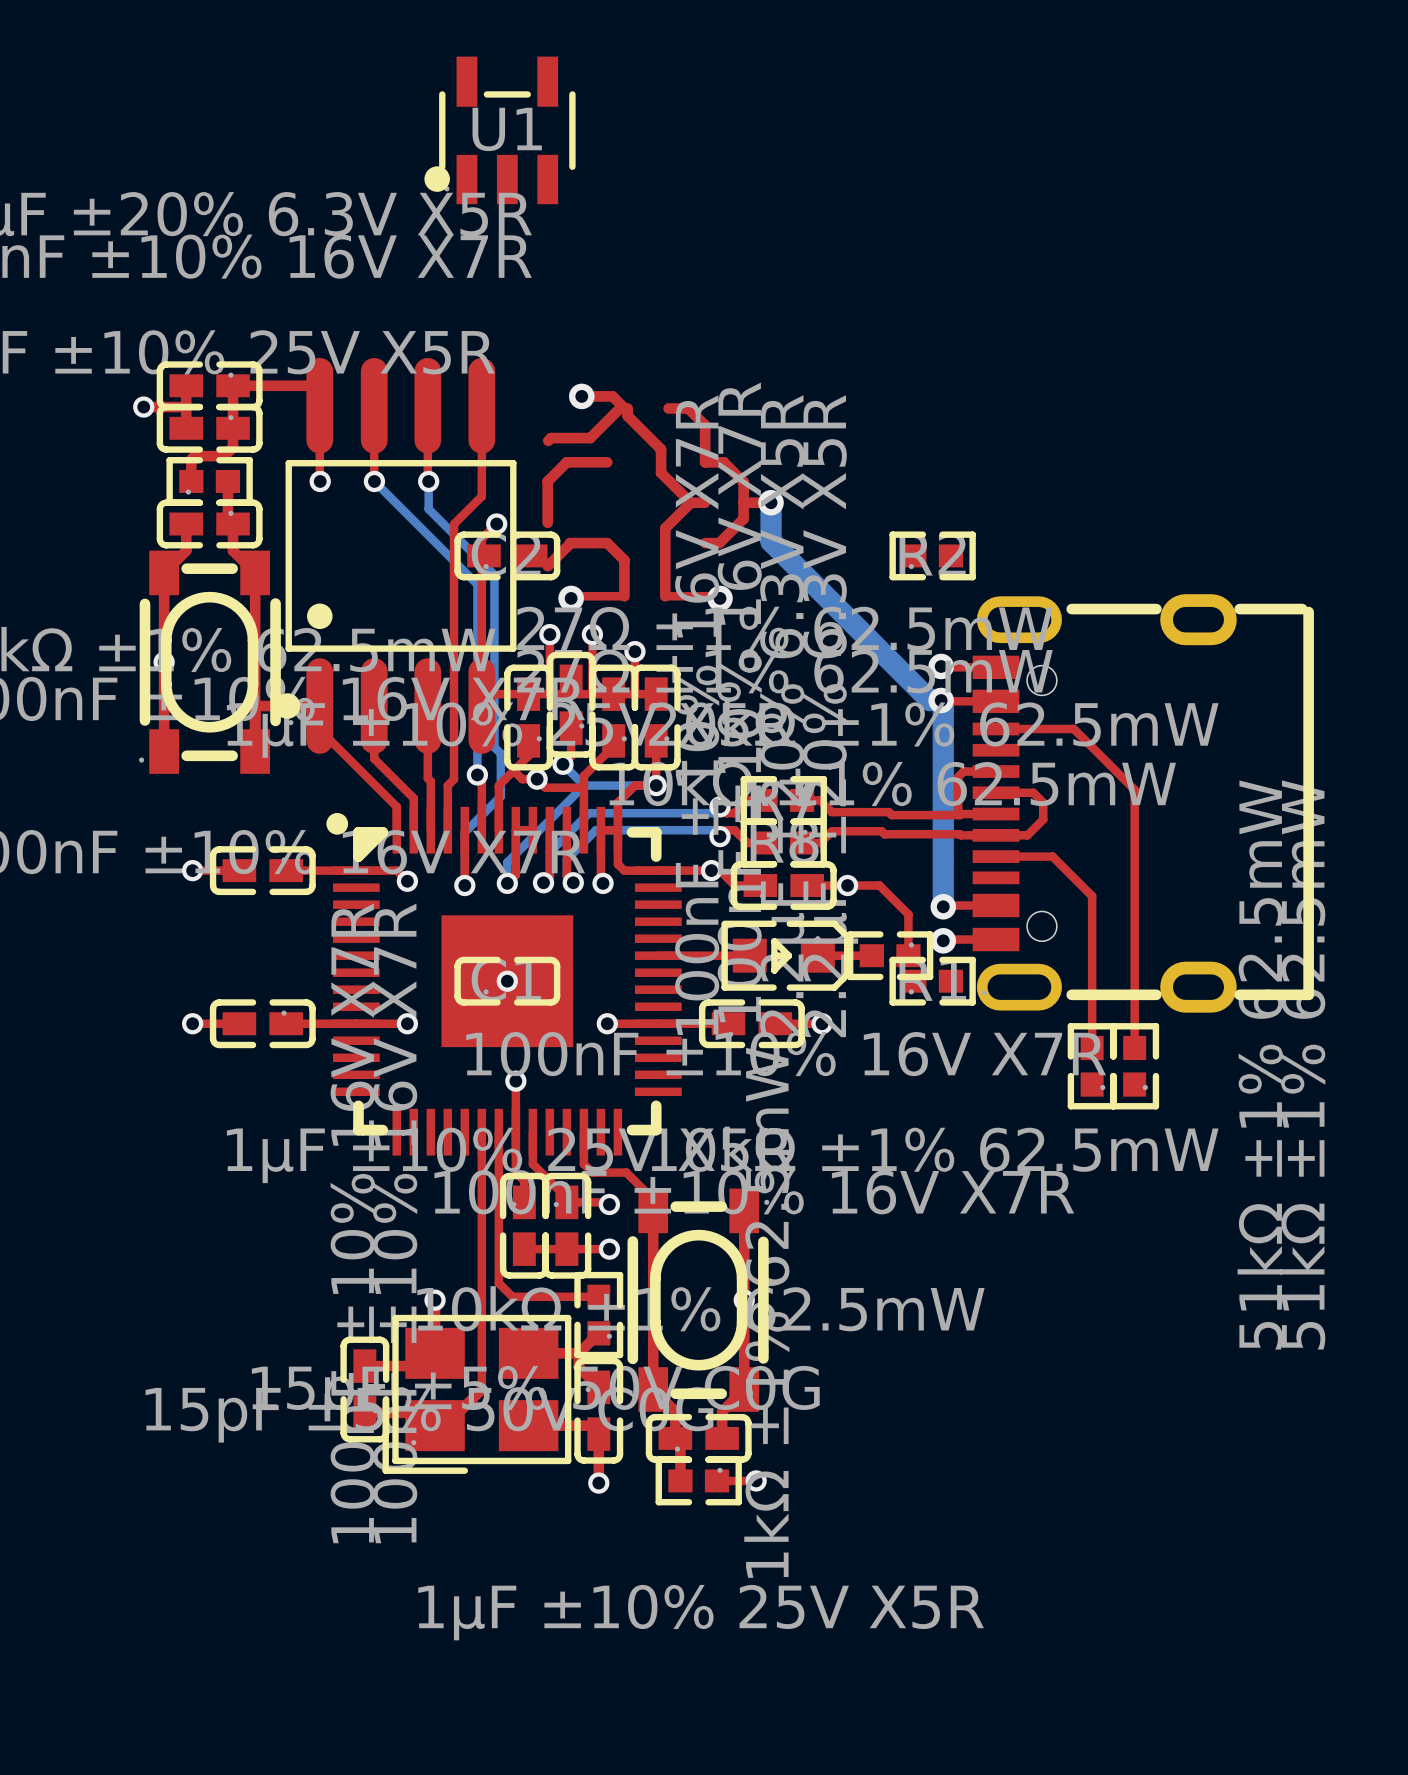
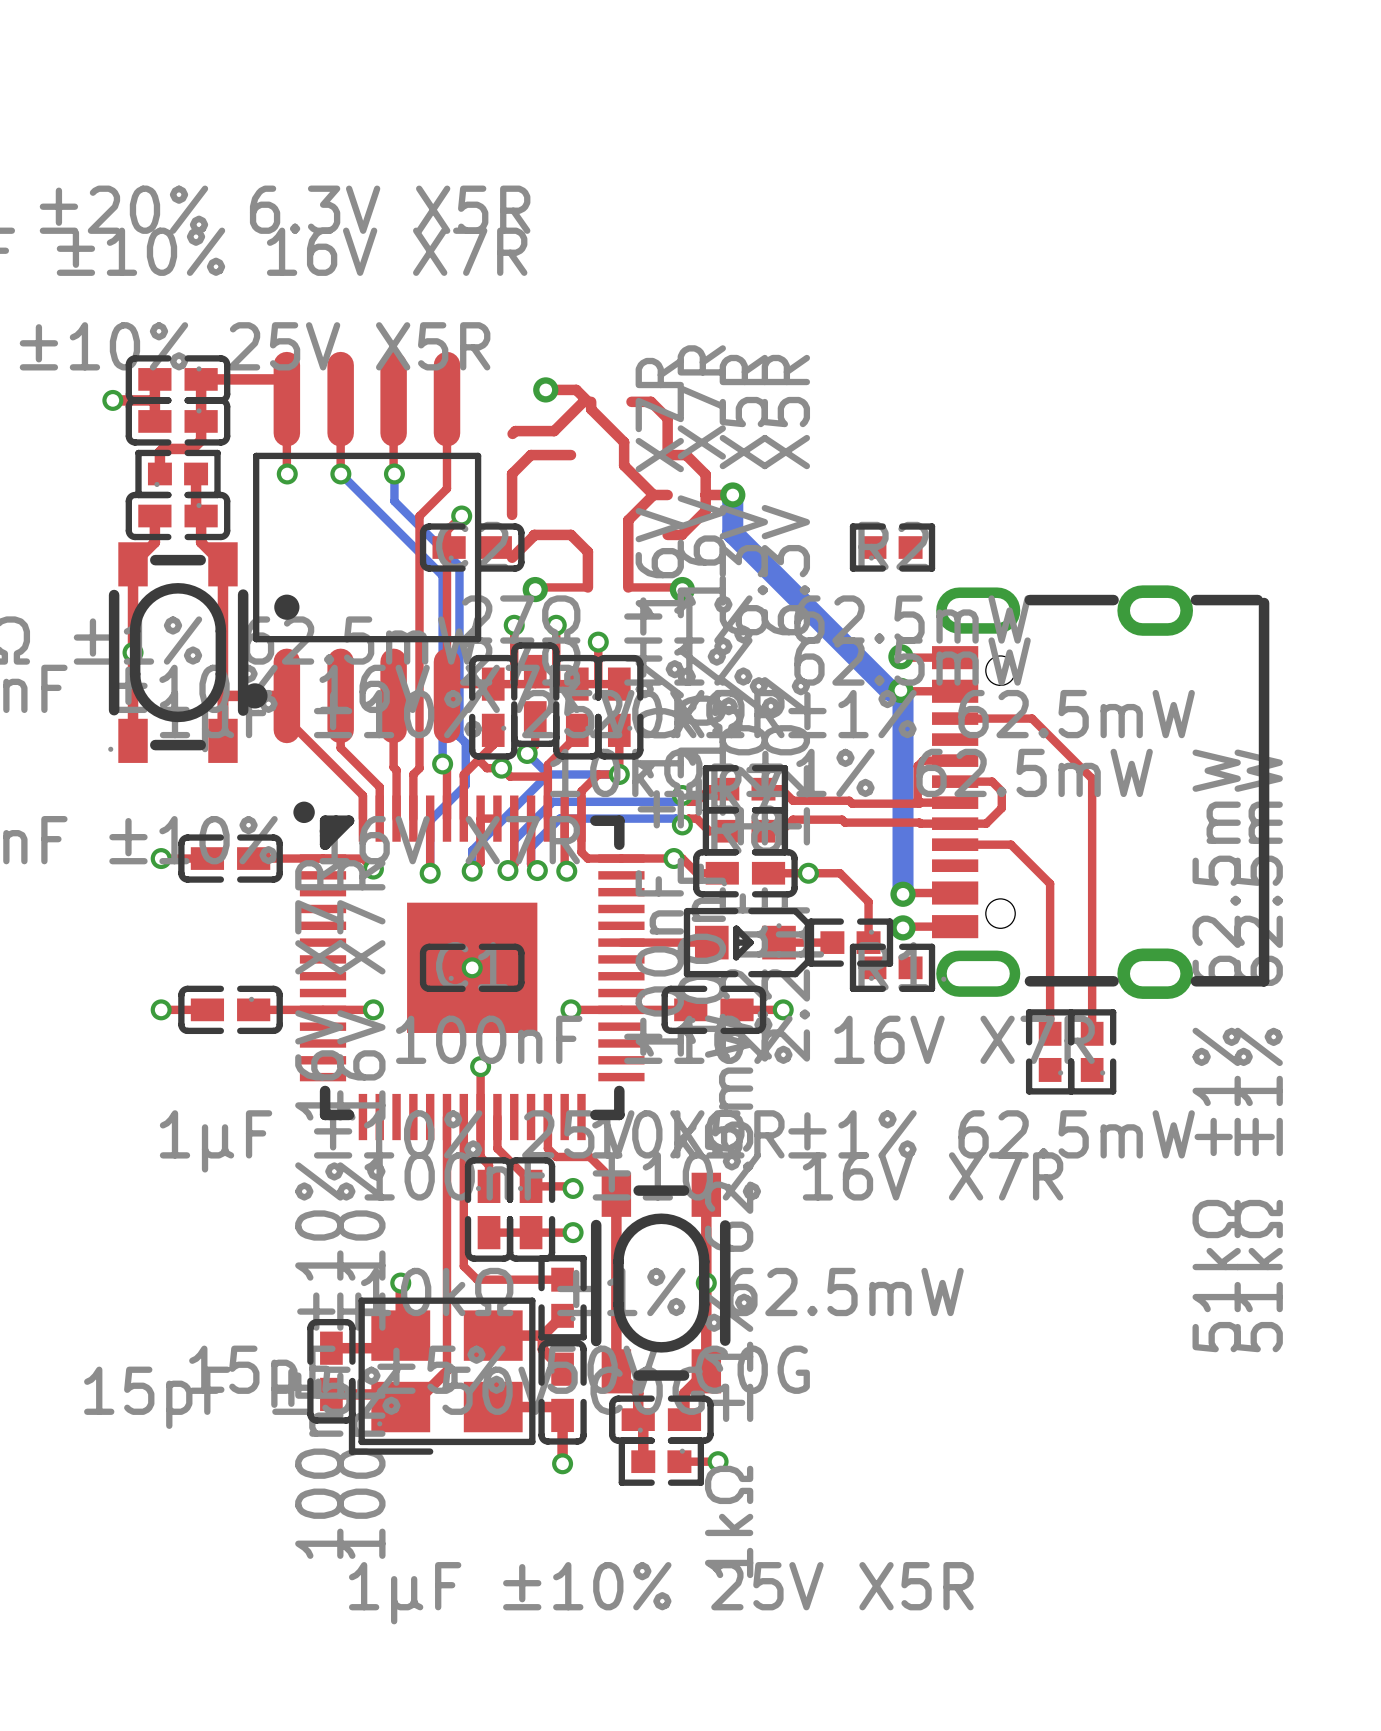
U1: (500, 130) -> none

